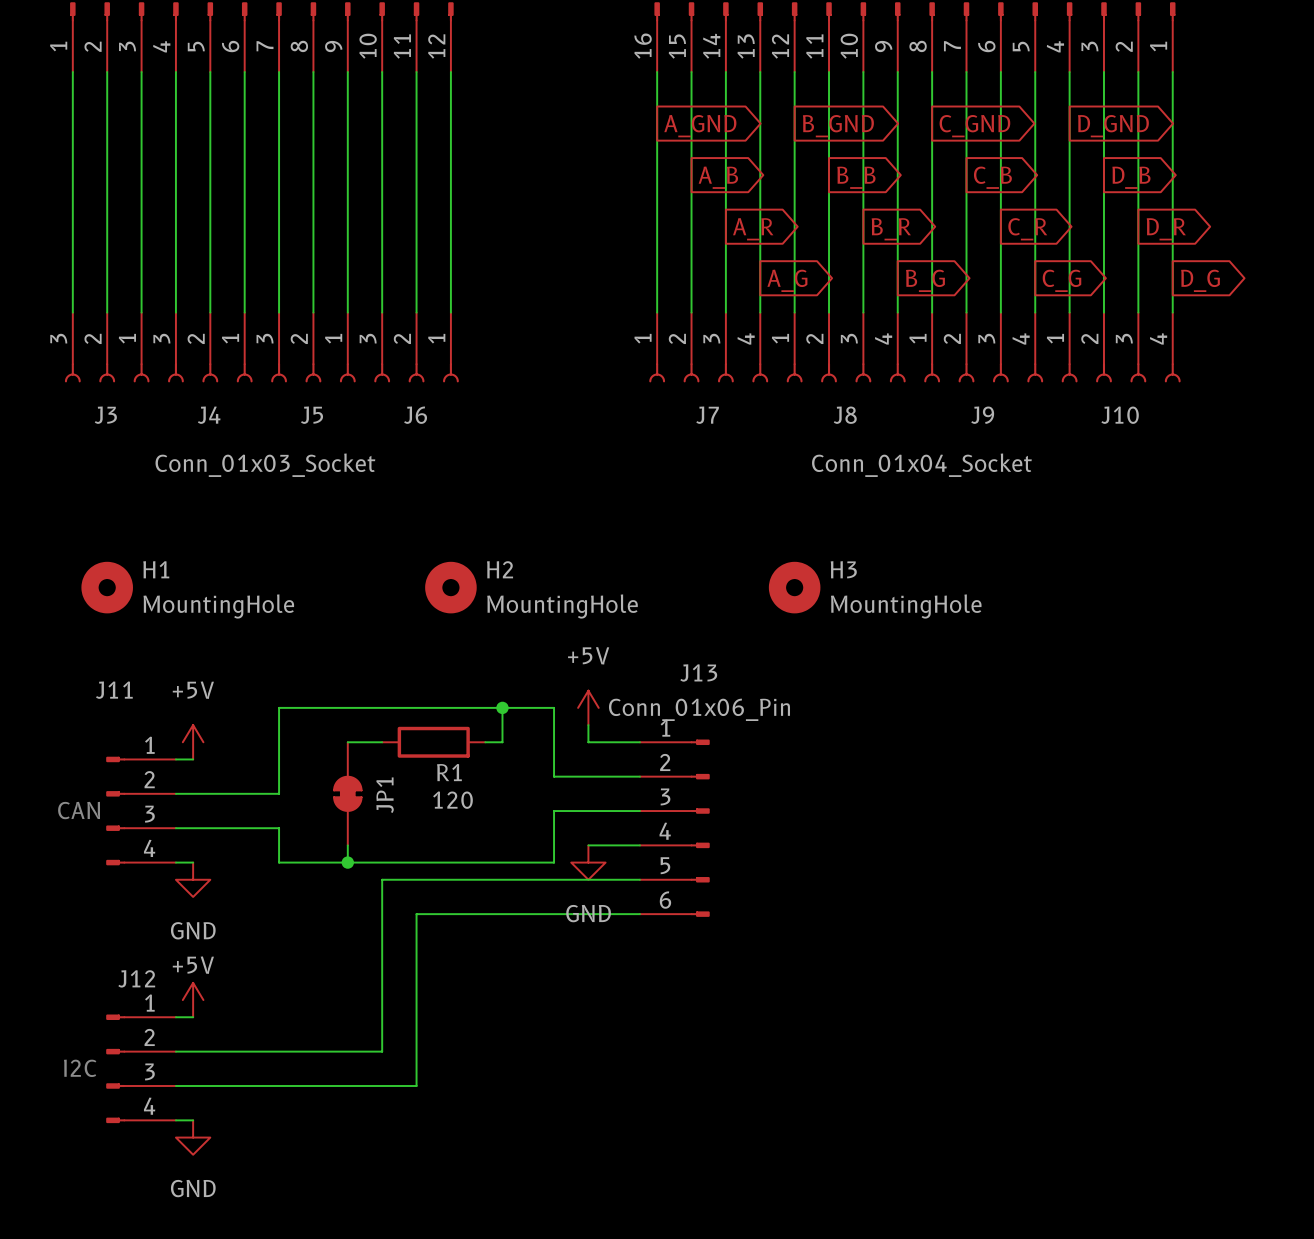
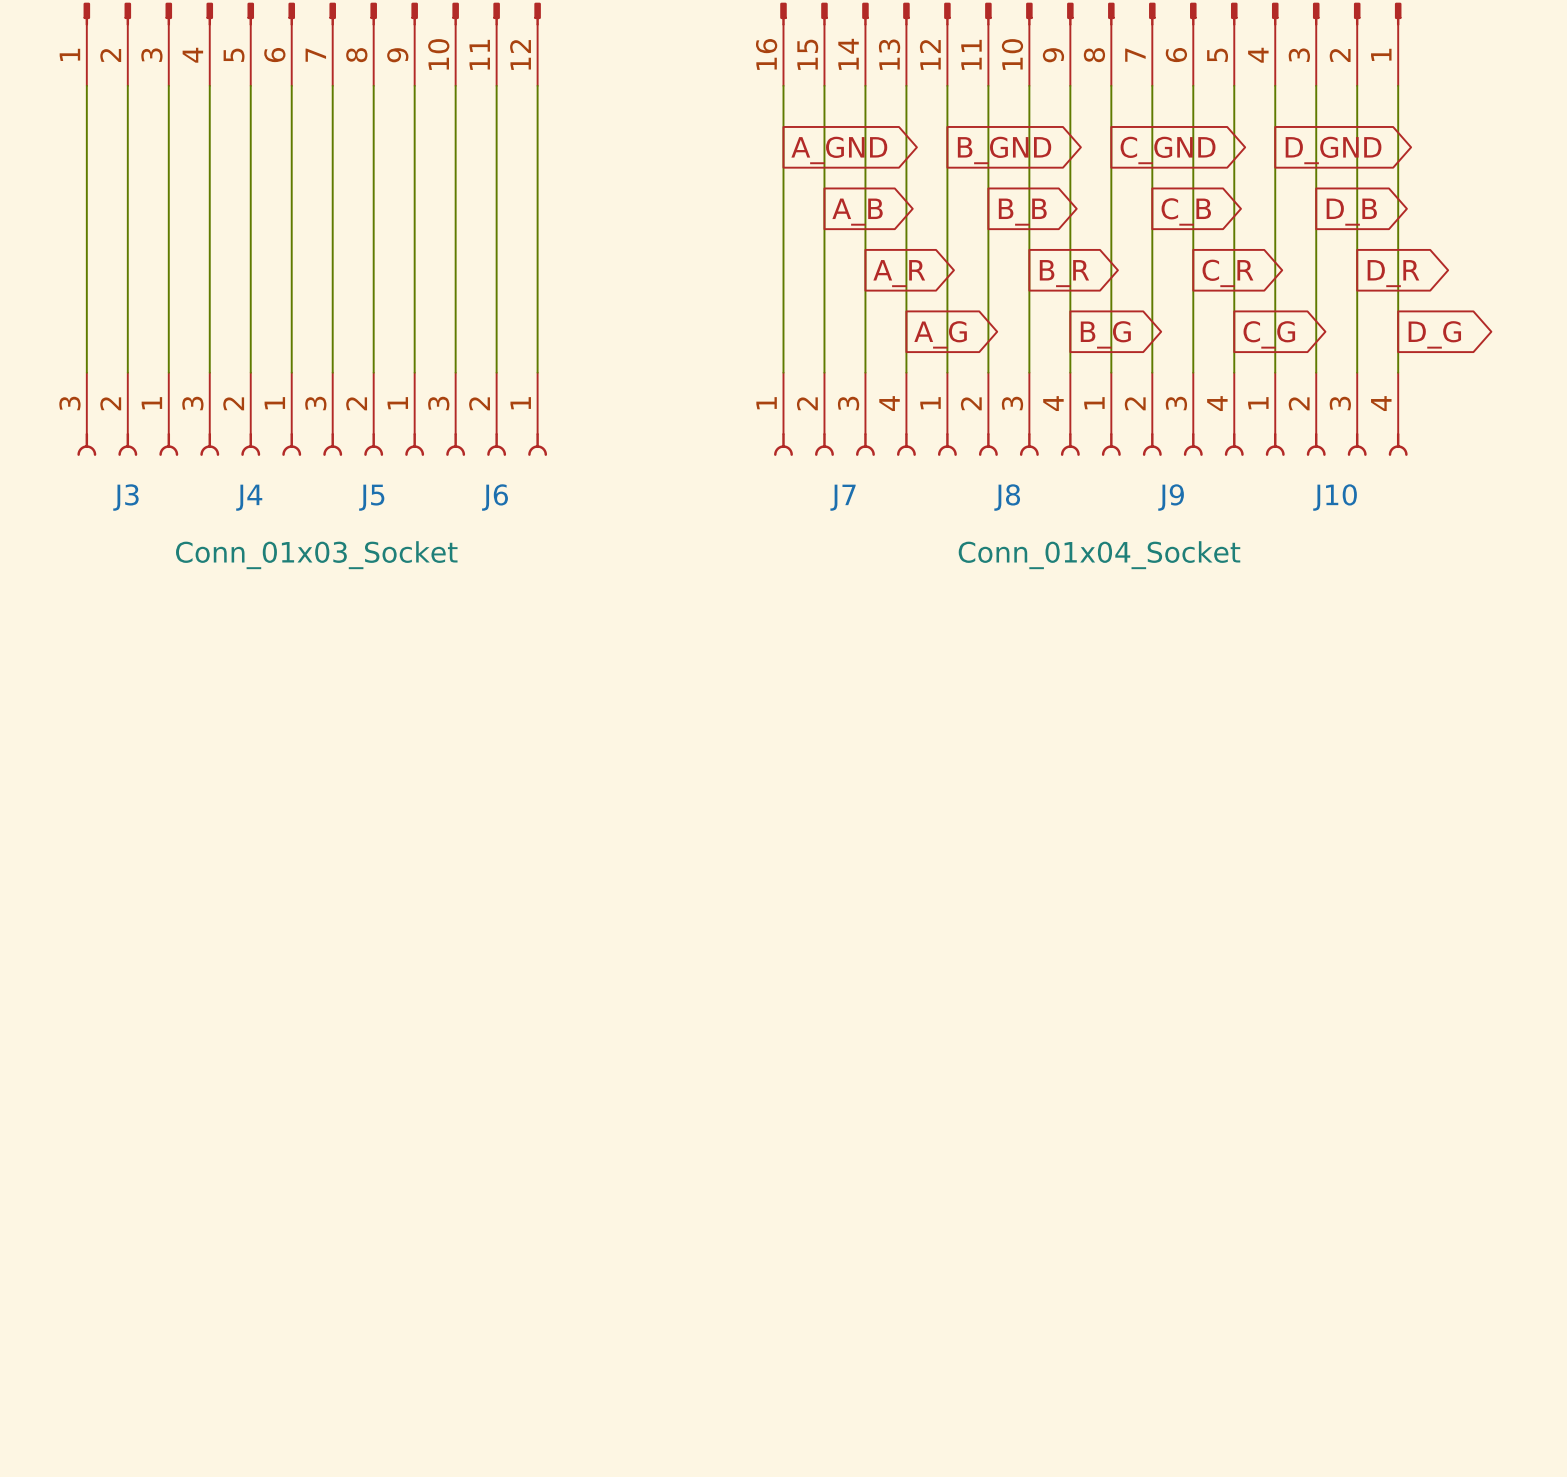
H1: MountingHole (107, 587) -> none
H2: MountingHole (450, 587) -> none
H3: MountingHole (794, 587) -> none
wire: (502, 707) (502, 742) (485, 742) -> none
junction: (502, 707) -> none
power symbol: +5V (588, 707) -> none
wire: (588, 725) (588, 742) (639, 742) -> none
power symbol: +5V (193, 742) -> none
wire: (347, 742) (382, 742) -> none
R1: 120 (433, 742) -> none
wire: (175, 759) (193, 759) -> none
wire: (639, 776) (554, 776) (554, 707) (279, 707) (279, 793) (175, 793) -> none
JP1: (347, 793) -> none
text: CAN (79, 810) -> none
J11: (141, 811) -> none
wire: (639, 811) (554, 811) (554, 862) (279, 862) (279, 828) (175, 828) -> none
J13: Conn_01x06_Pin (674, 828) -> none
wire: (347, 845) (347, 862) -> none
wire: (588, 845) (639, 845) -> none
wire: (175, 862) (193, 862) -> none
junction: (347, 862) -> none
power symbol: GND (588, 862) -> none
power symbol: GND (193, 879) -> none
wire: (639, 879) (382, 879) (382, 1051) (175, 1051) -> none
wire: (639, 914) (416, 914) (416, 1085) (175, 1085) -> none
power symbol: +5V (193, 1000) -> none
wire: (175, 1017) (193, 1017) -> none
text: I2C (80, 1068) -> none
J12: (141, 1068) -> none
wire: (175, 1120) (193, 1120) -> none
power symbol: GND (193, 1137) -> none

